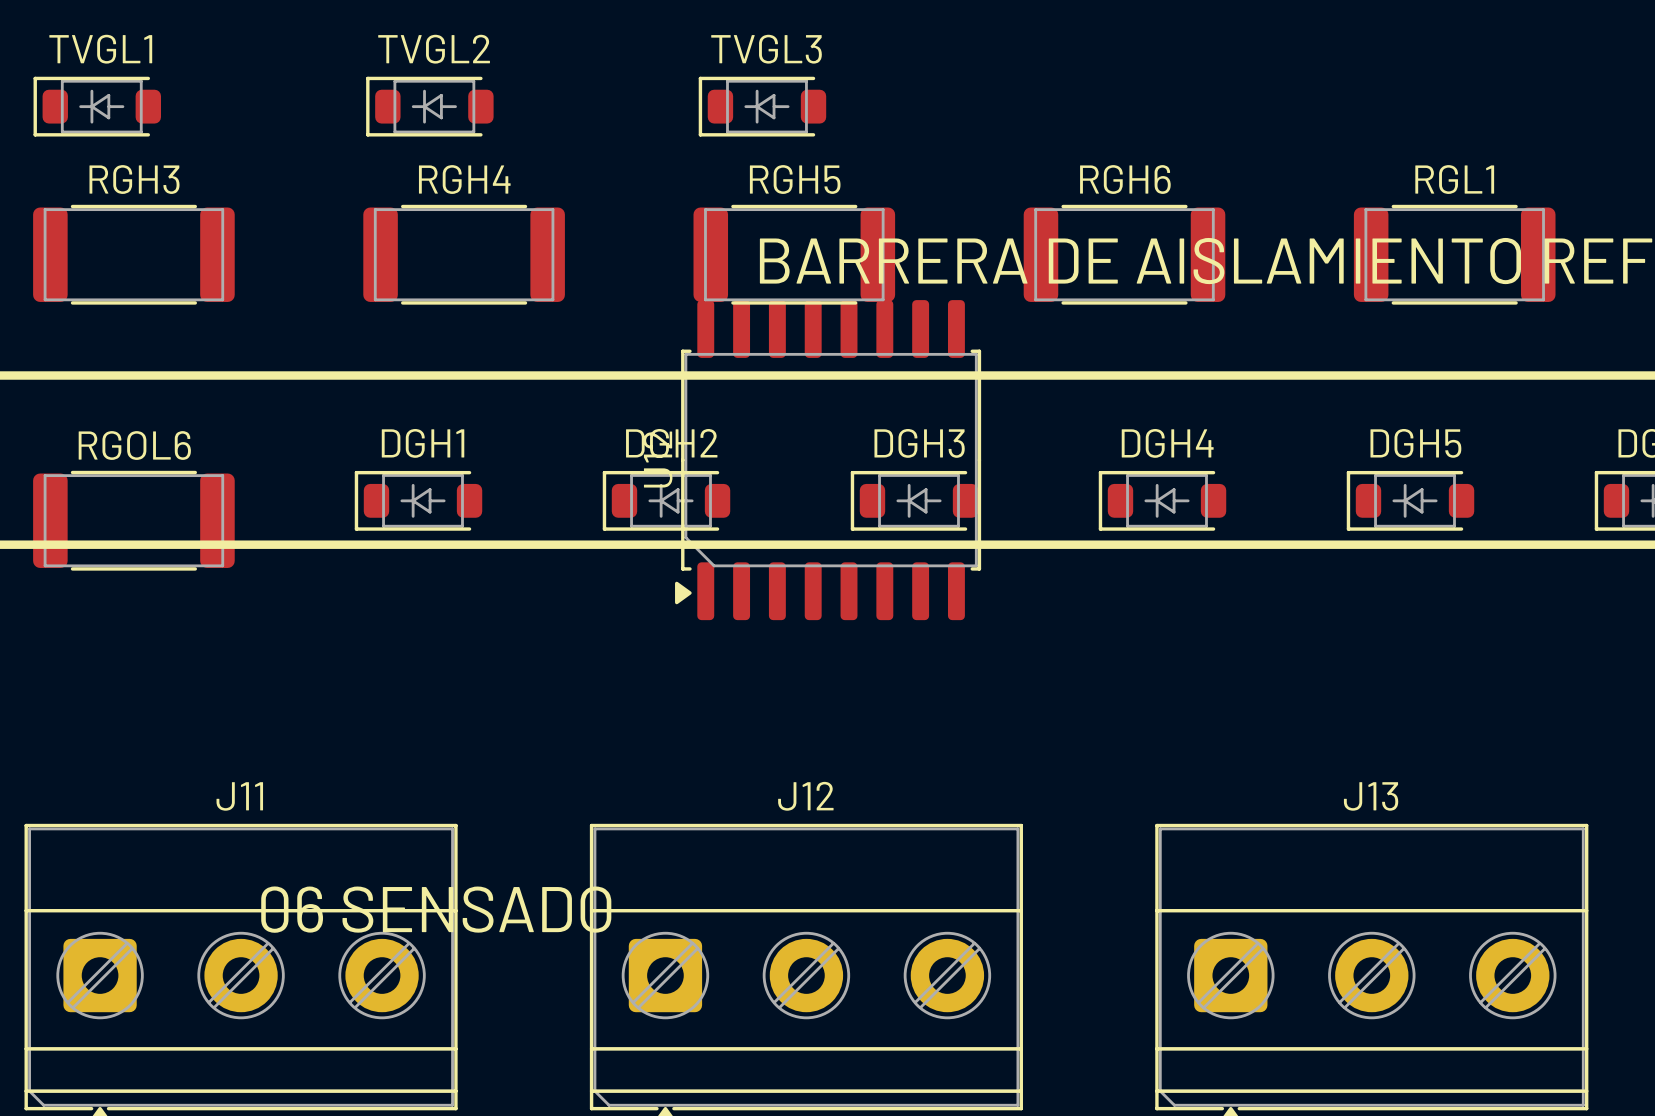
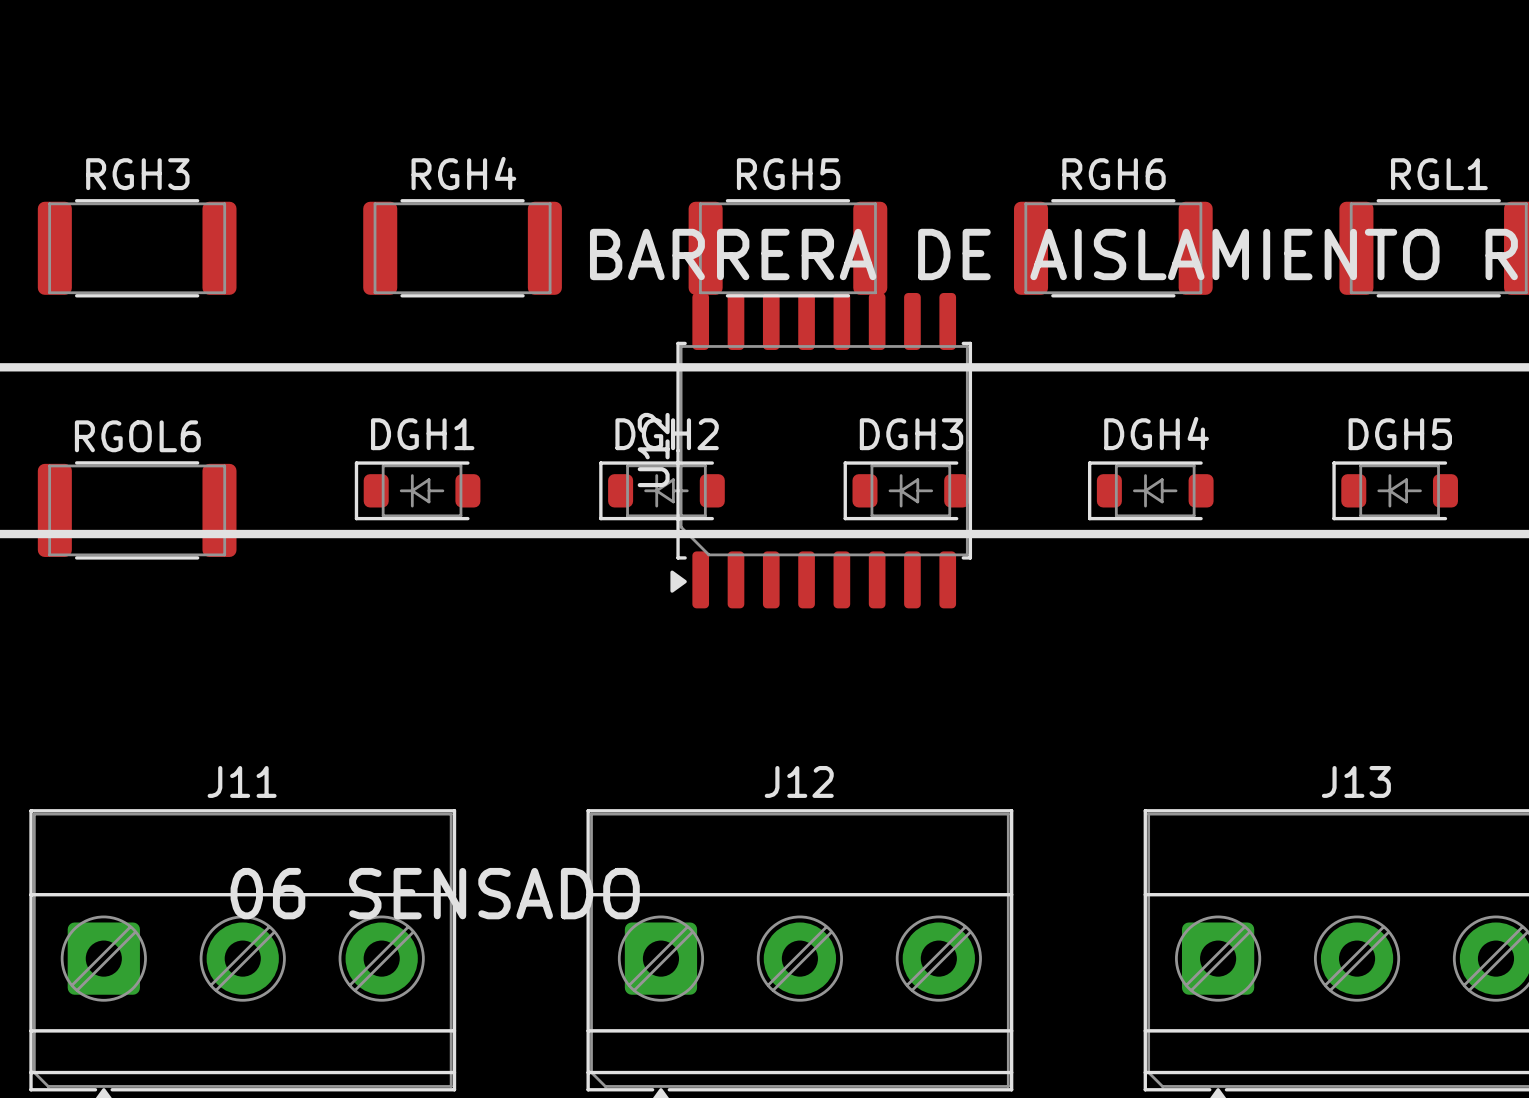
TVGL1: (97, 106) -> none
TVGL2: (429, 106) -> none
TVGL3: (762, 106) -> none

